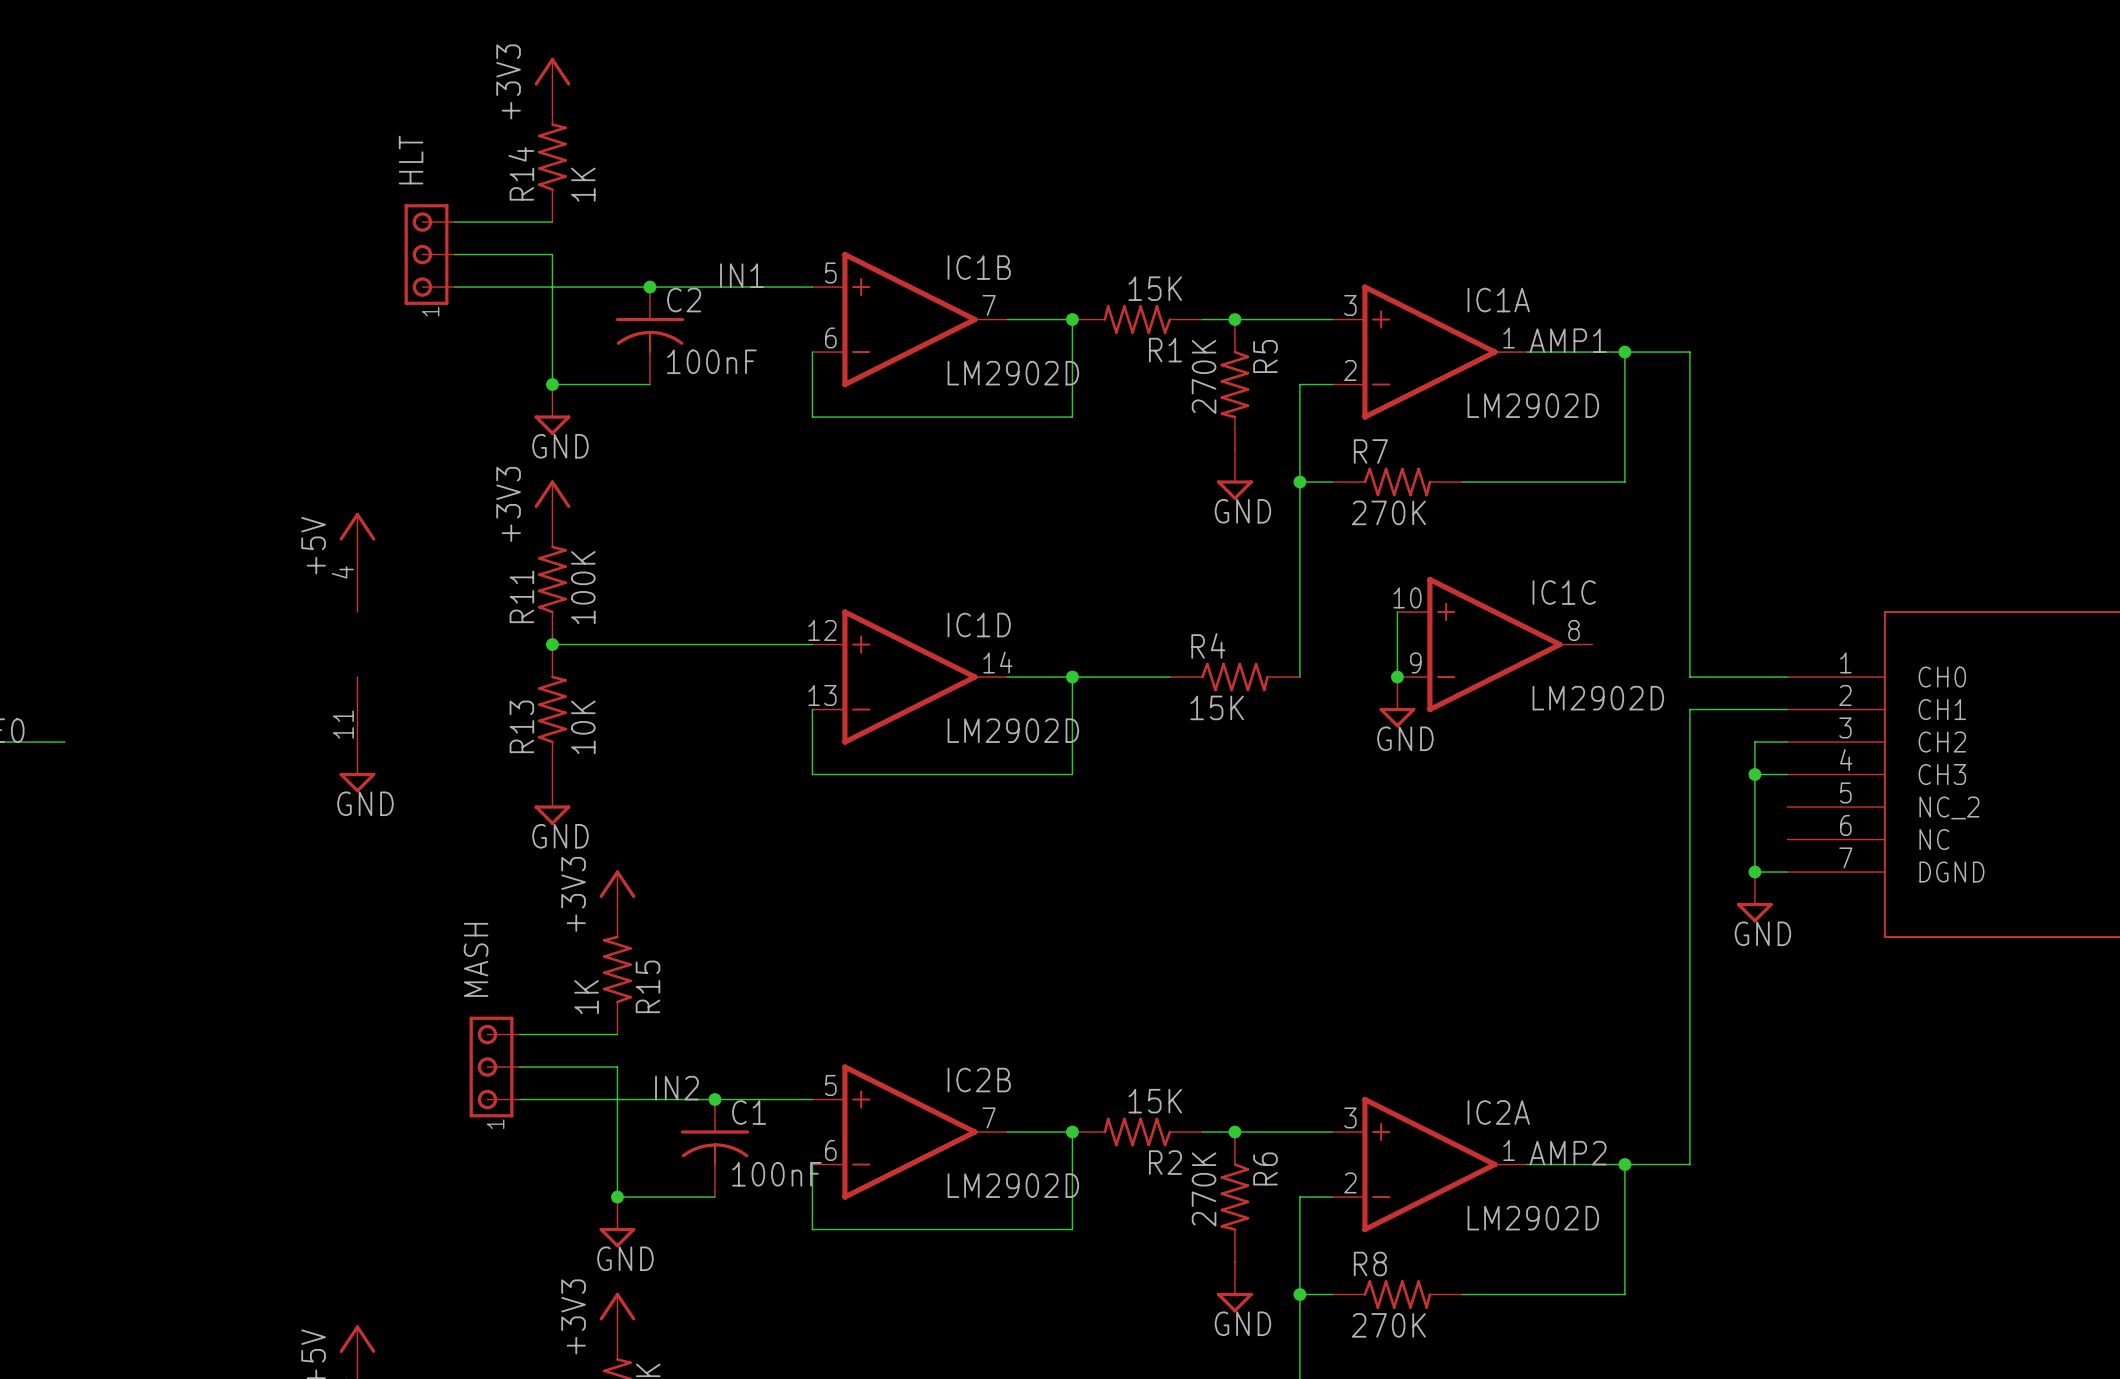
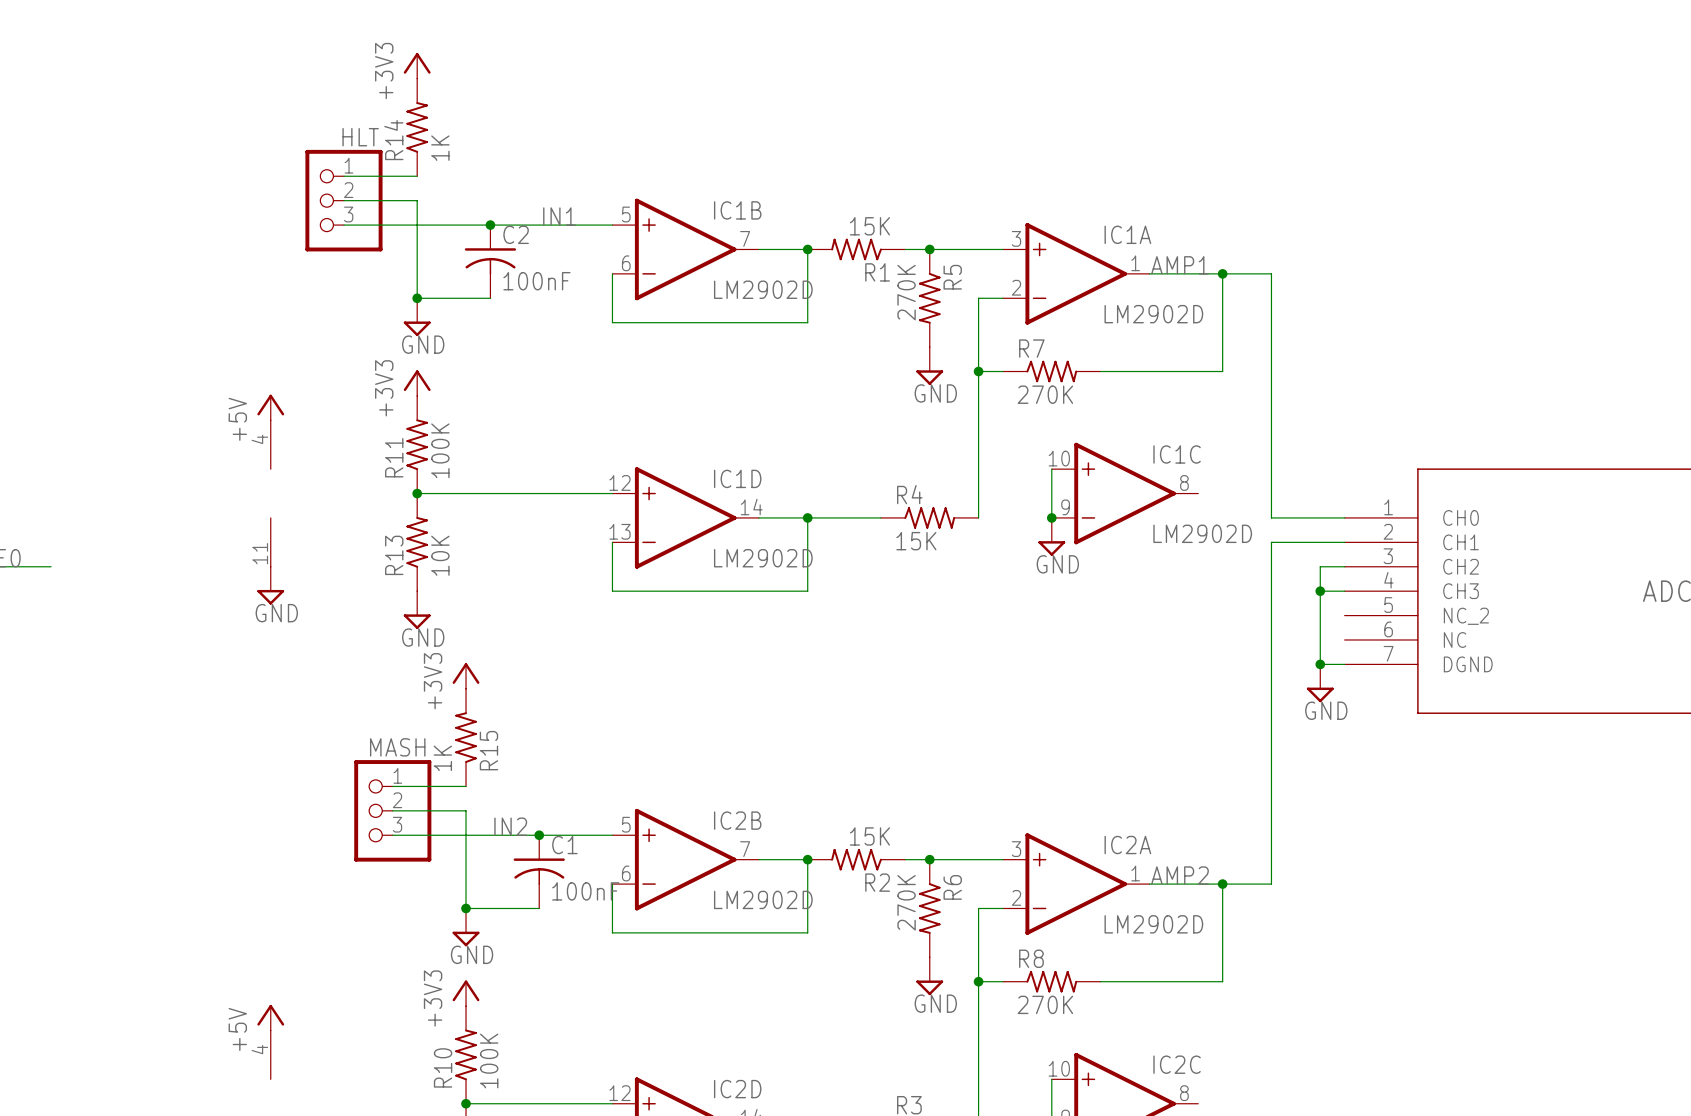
HLT: (429, 254) -> none
HLT: none -> (343, 200)
MASH: (494, 1067) -> none
MASH: none -> (392, 810)

